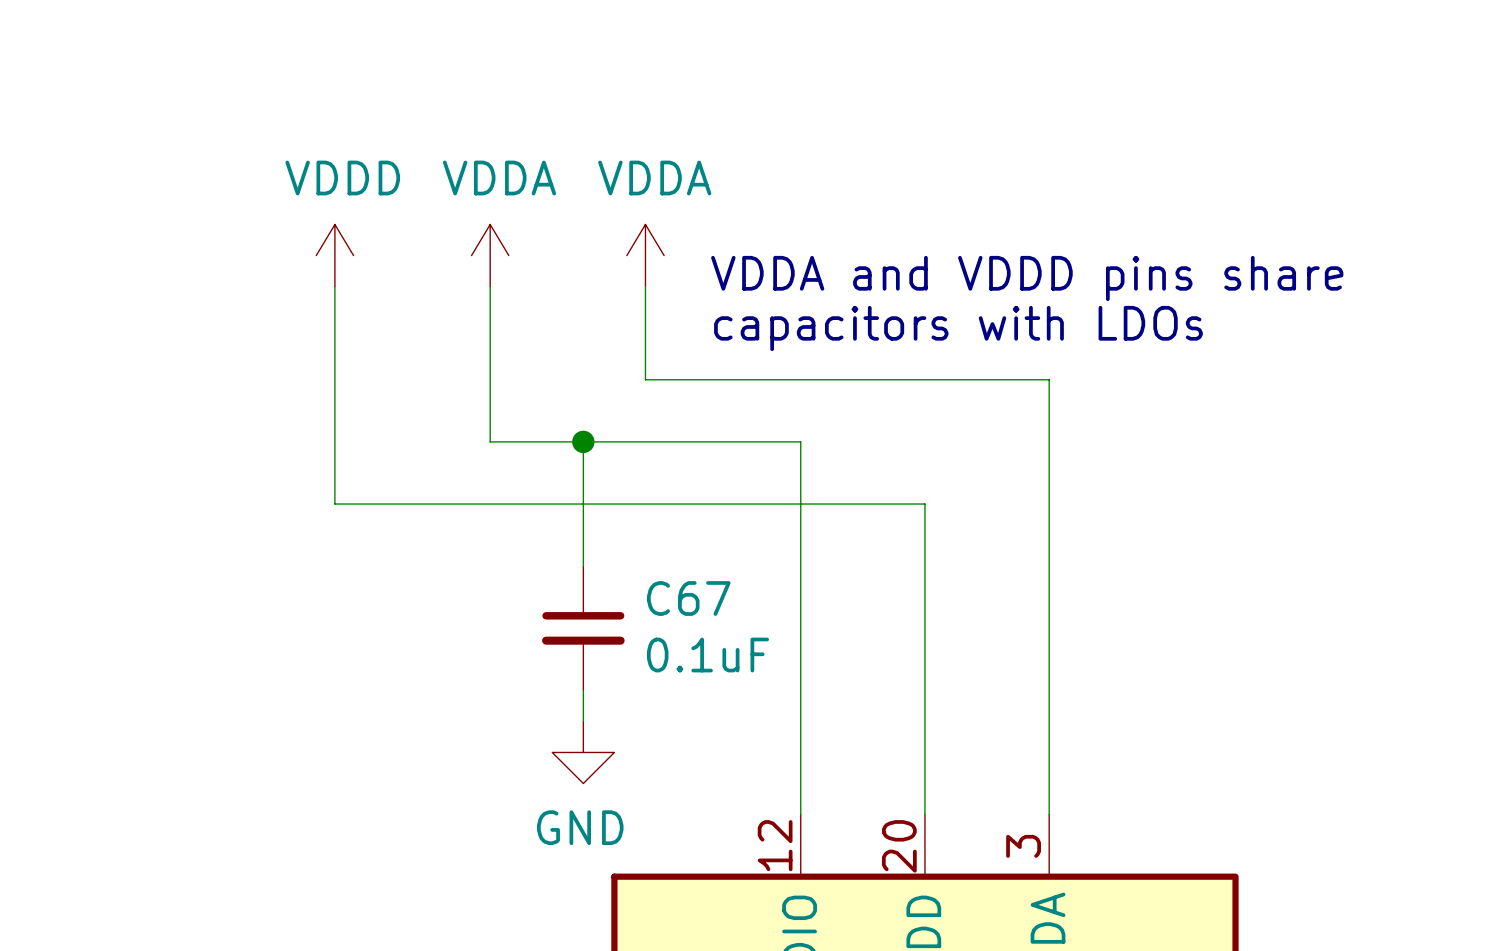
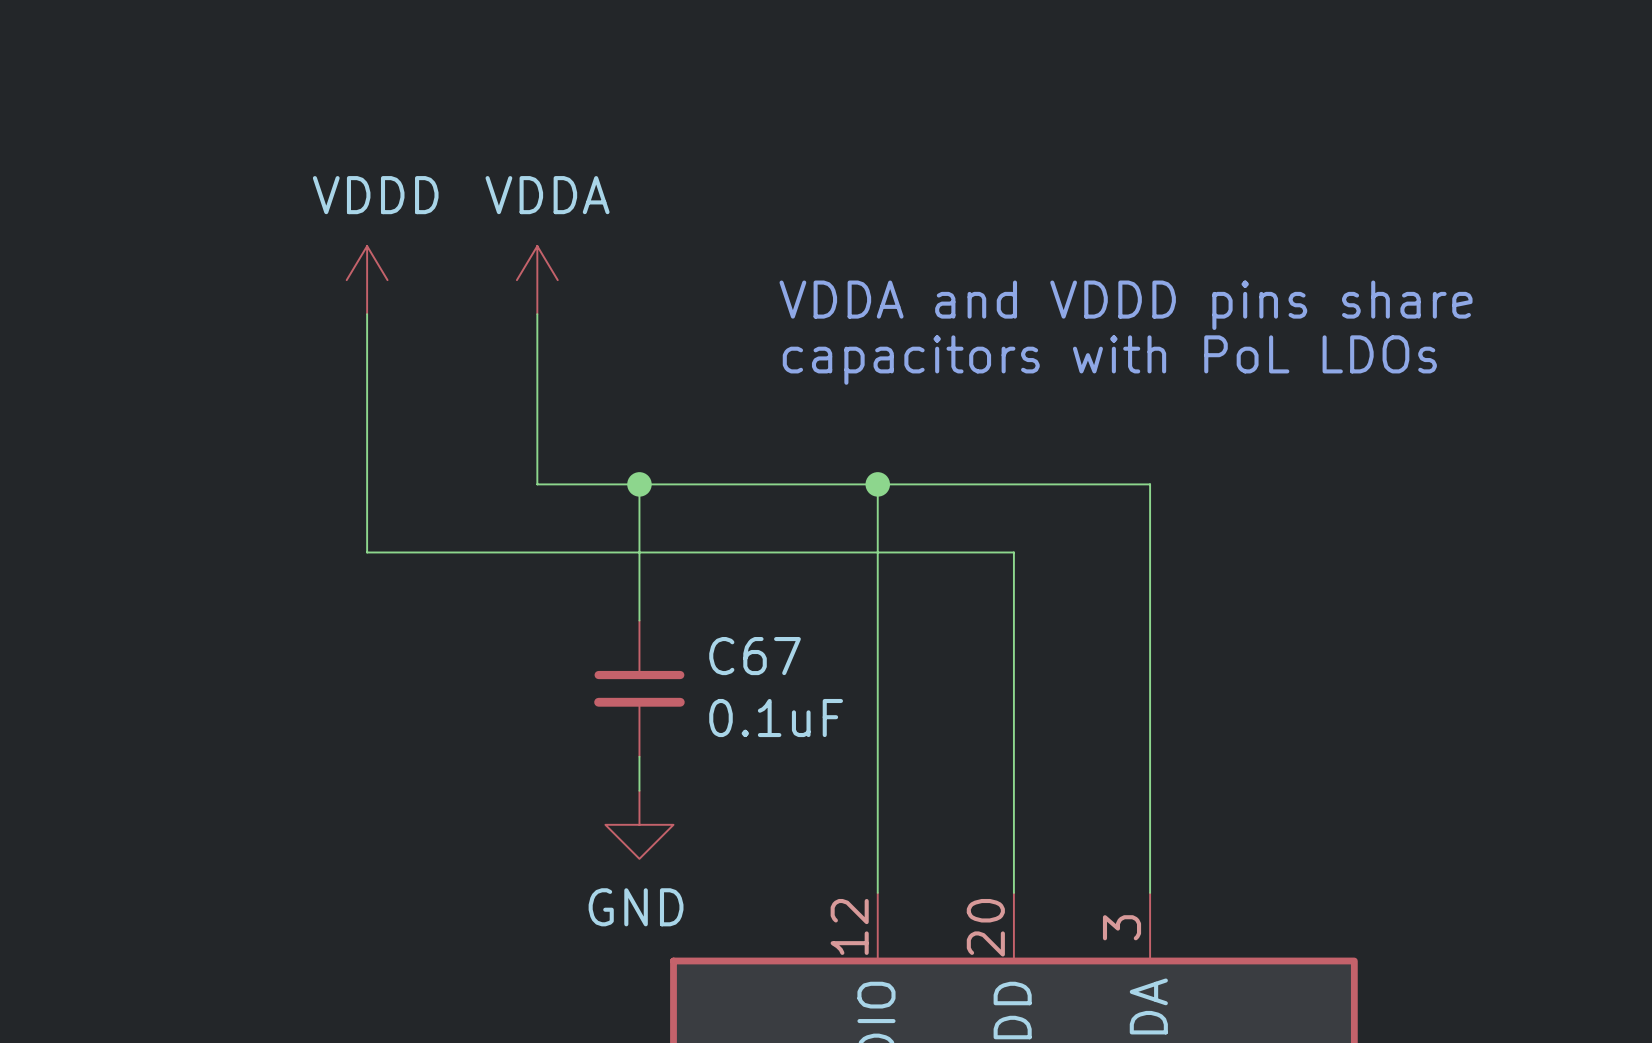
power symbol: VDDA (645, 255) -> none
wire: (645, 286) (645, 379) (1049, 379) (1049, 441) -> (877, 484) (1150, 484)
text: capacitors with LDOs (958, 328) -> capacitors with PoL LDOs (1109, 360)
junction: none -> (877, 484)

